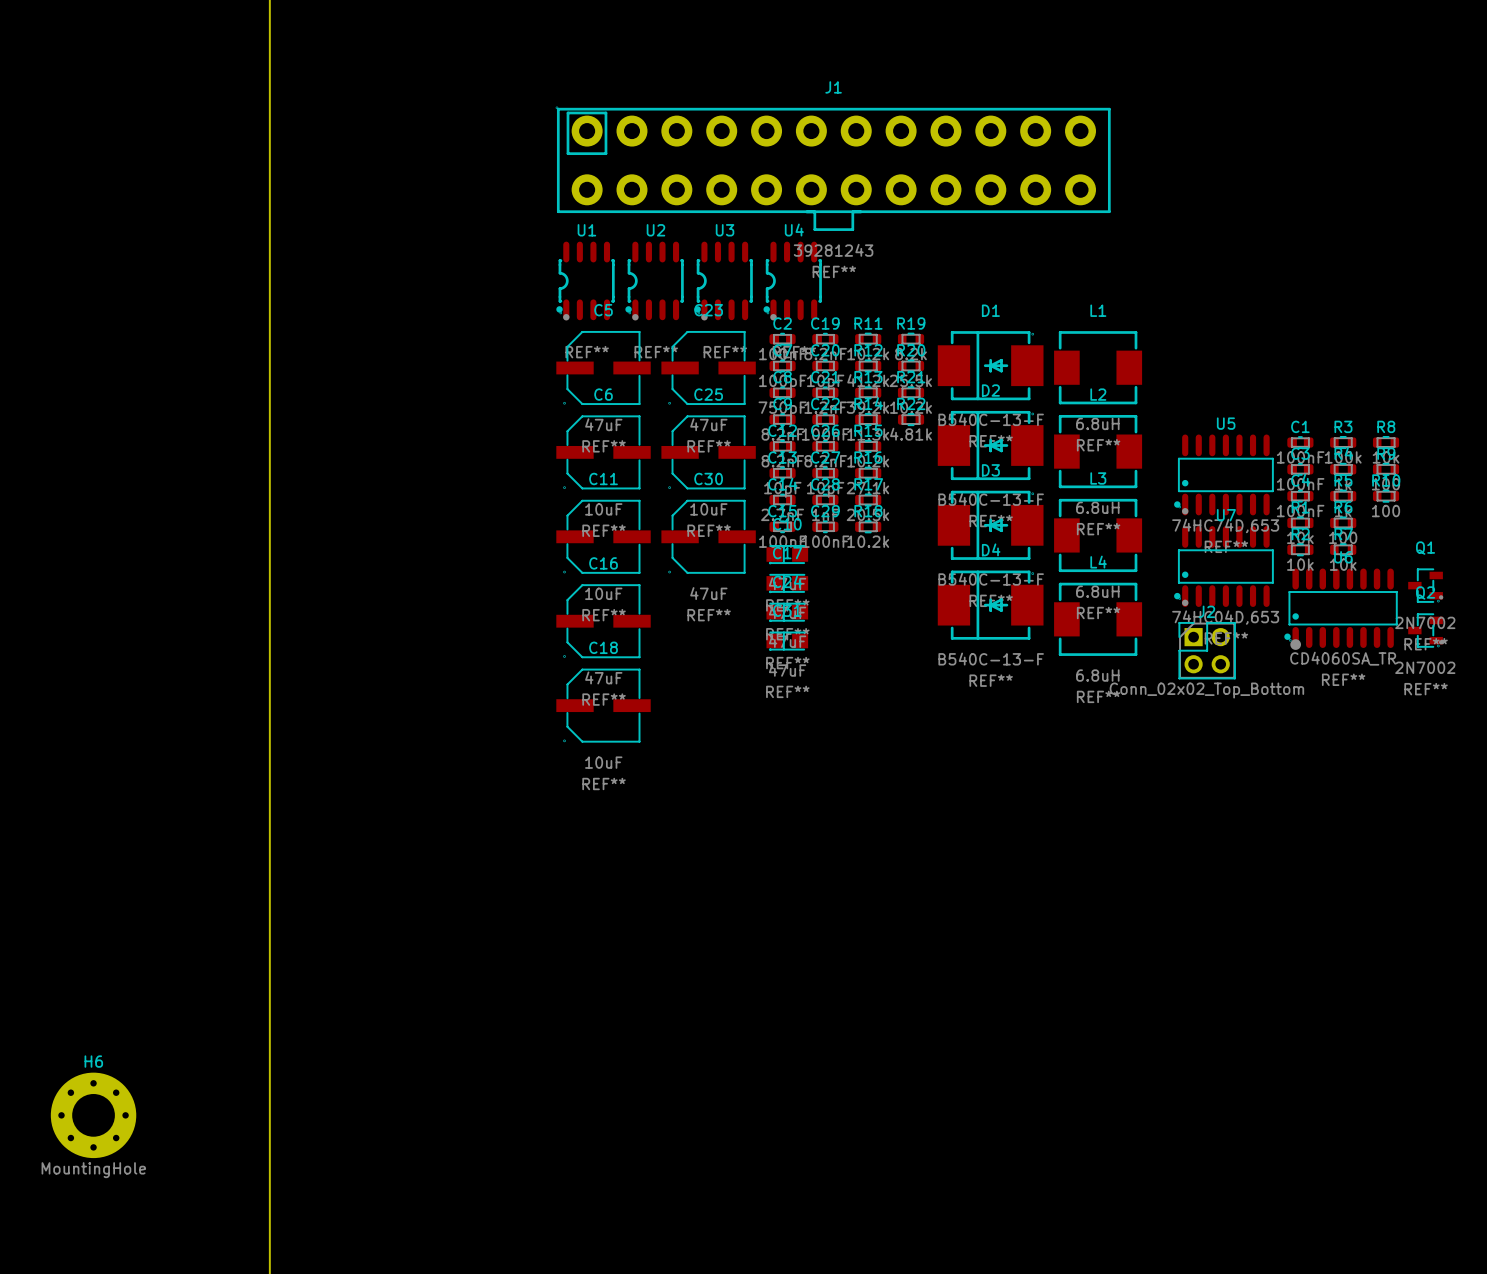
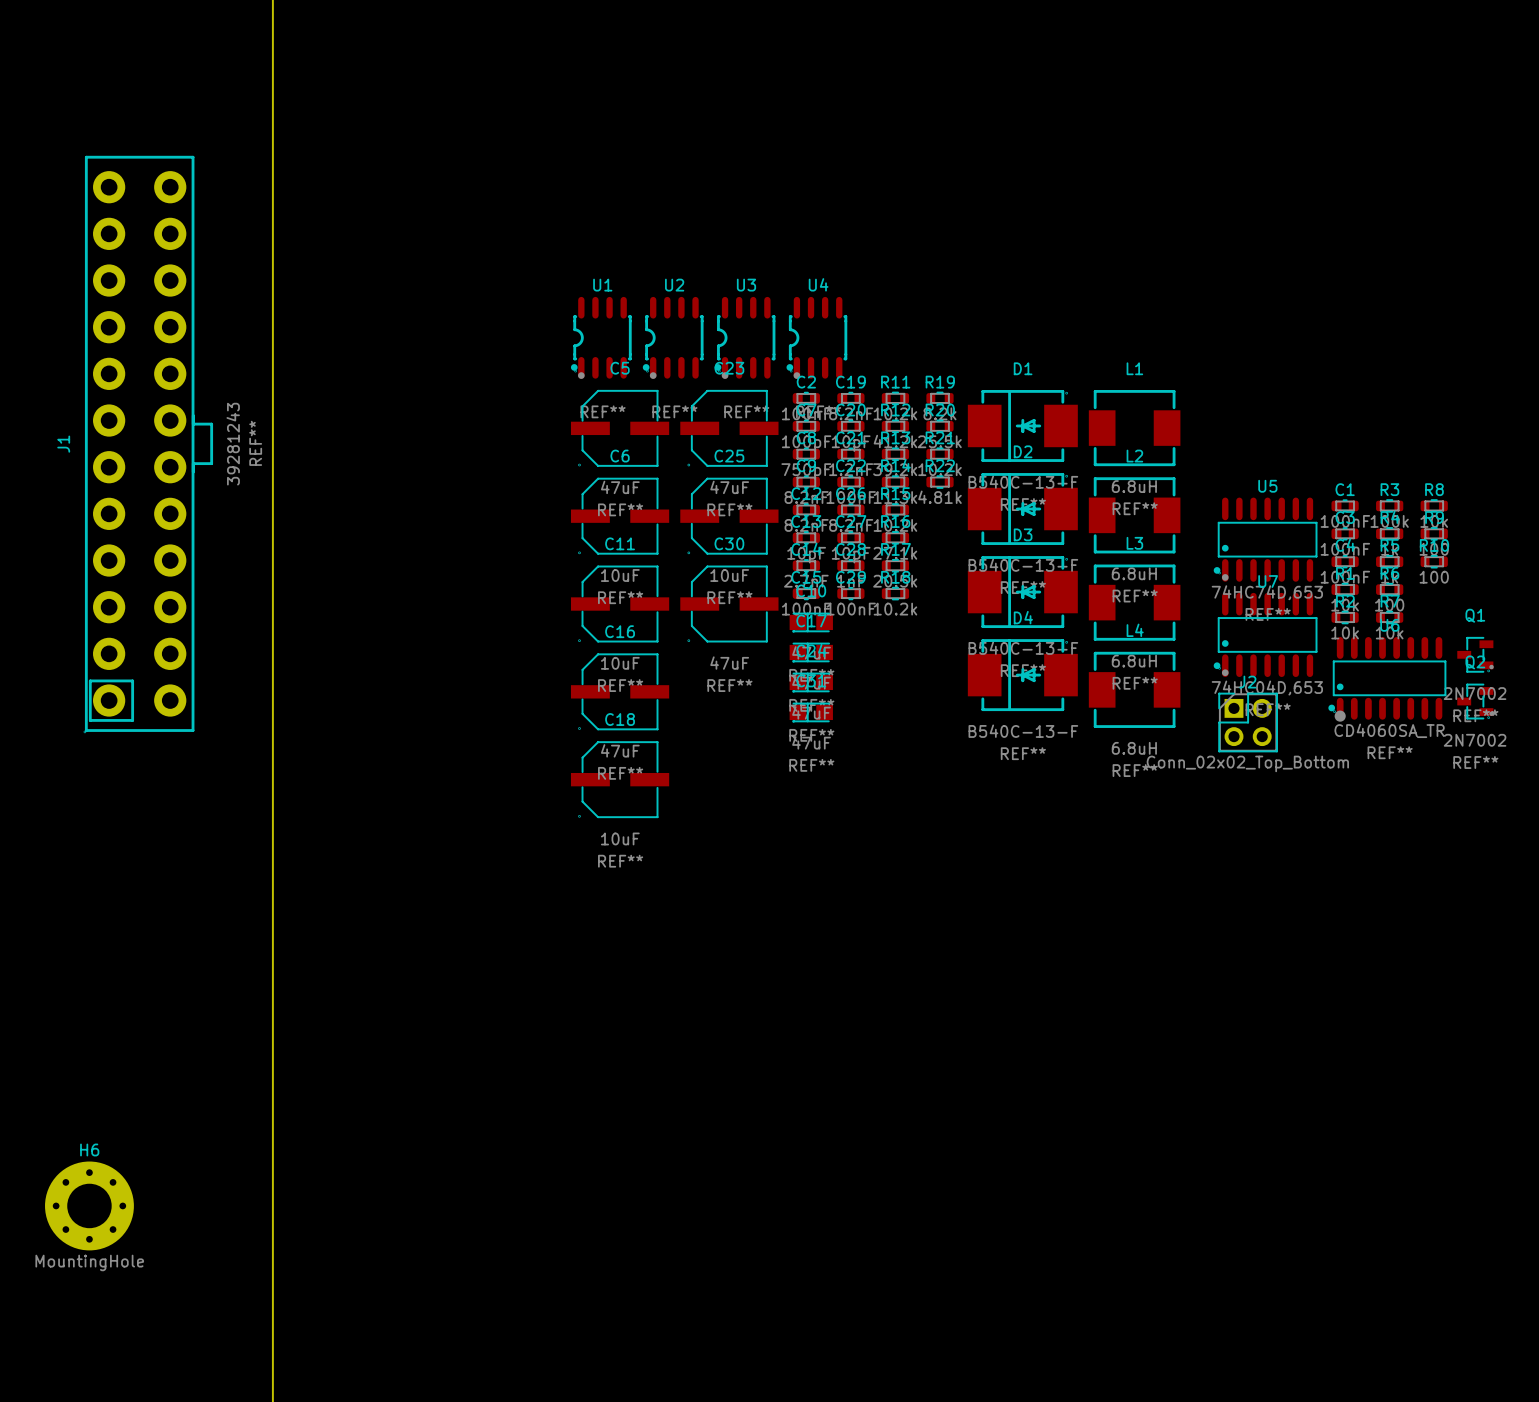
J1 rotation: 0° (833, 169) -> 90° counterclockwise (148, 444)
J1 position: (833, 169) -> (148, 444)

